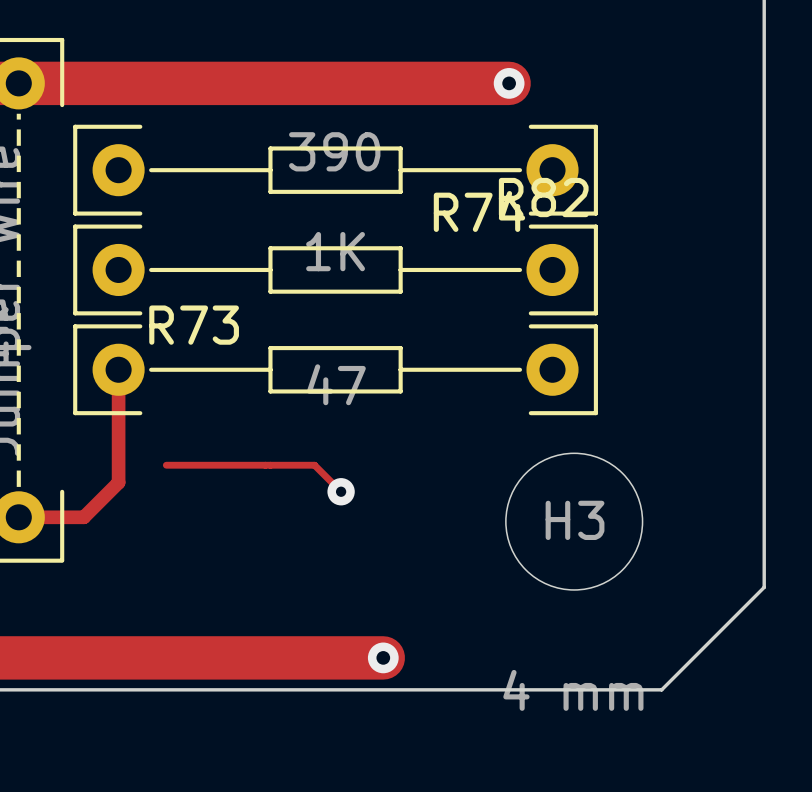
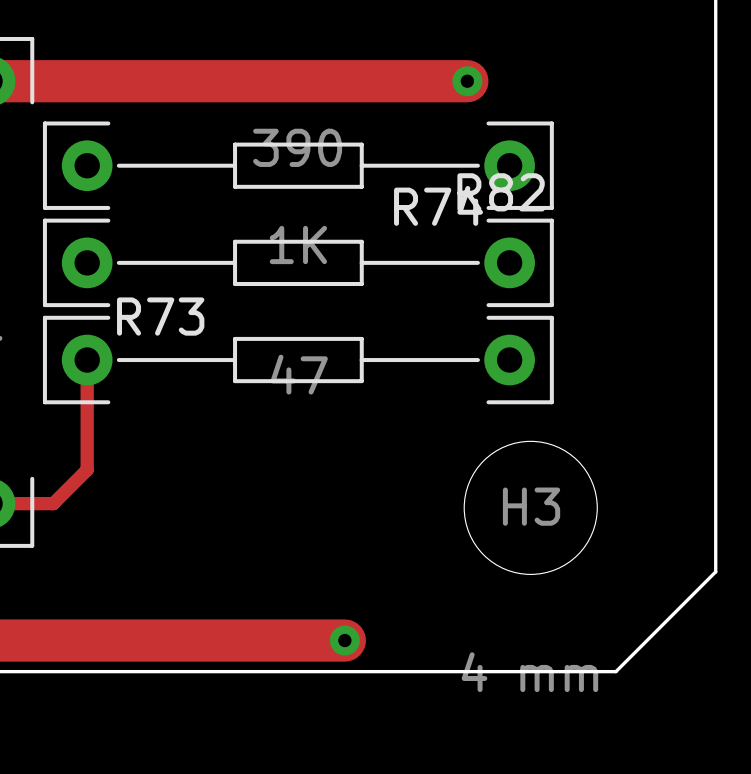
track: (166, 465) (314, 465) (341, 491) -> none
via: (341, 491) -> none

